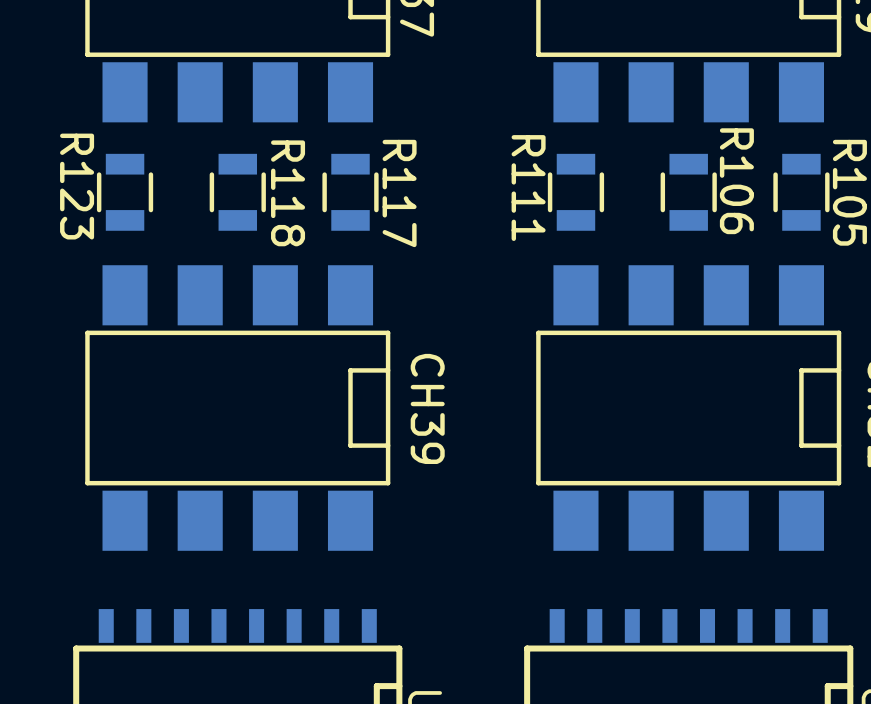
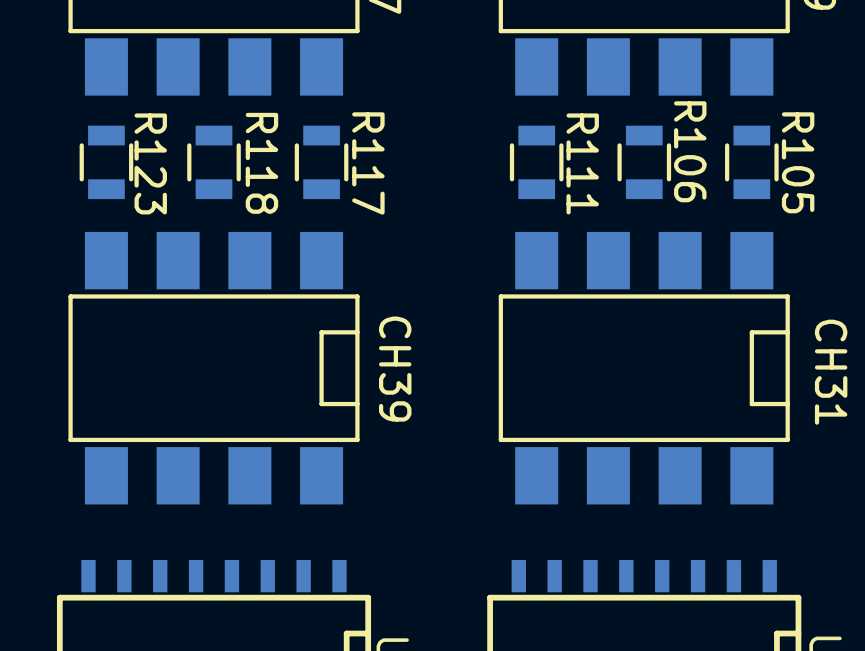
R123 name position: R123 (77, 186) -> R123 (150, 163)
R111 name position: R111 (528, 188) -> R111 (582, 163)

